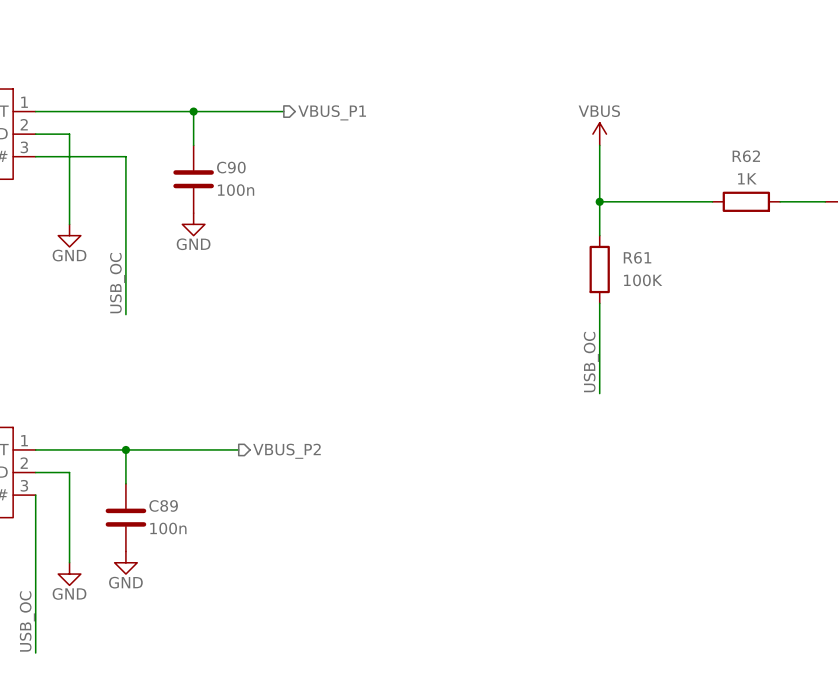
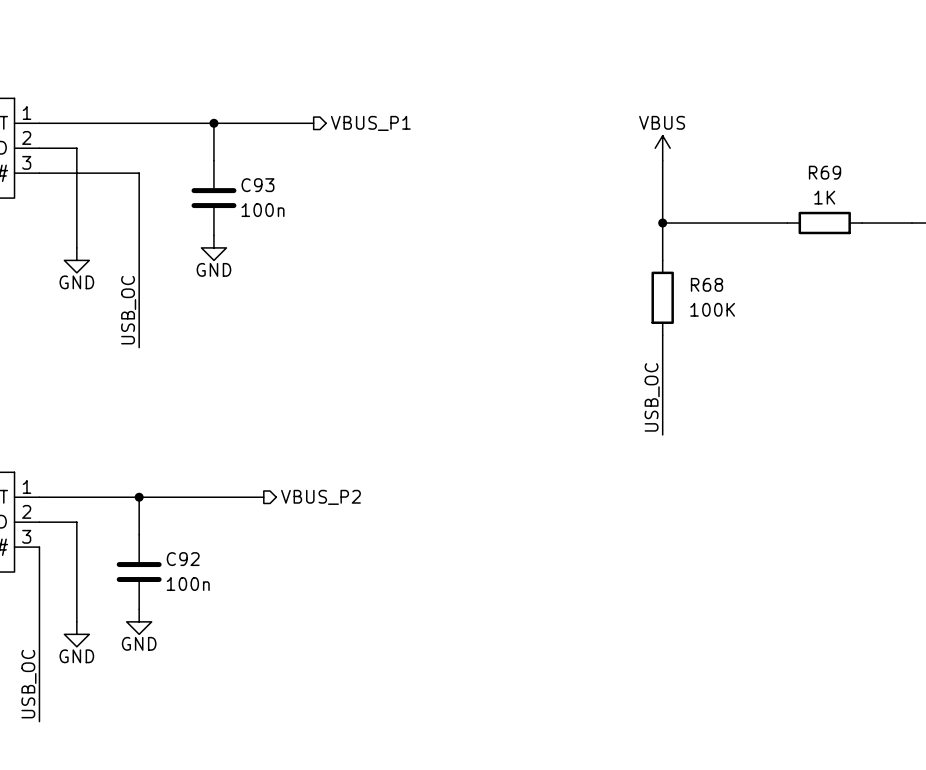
R62 name: R62 (746, 156) -> R69 (825, 172)
C90 name: C90 (231, 167) -> C93 (257, 185)
R61 name: R61 (637, 257) -> R68 (707, 284)
C89 name: C89 (163, 505) -> C92 (183, 559)

